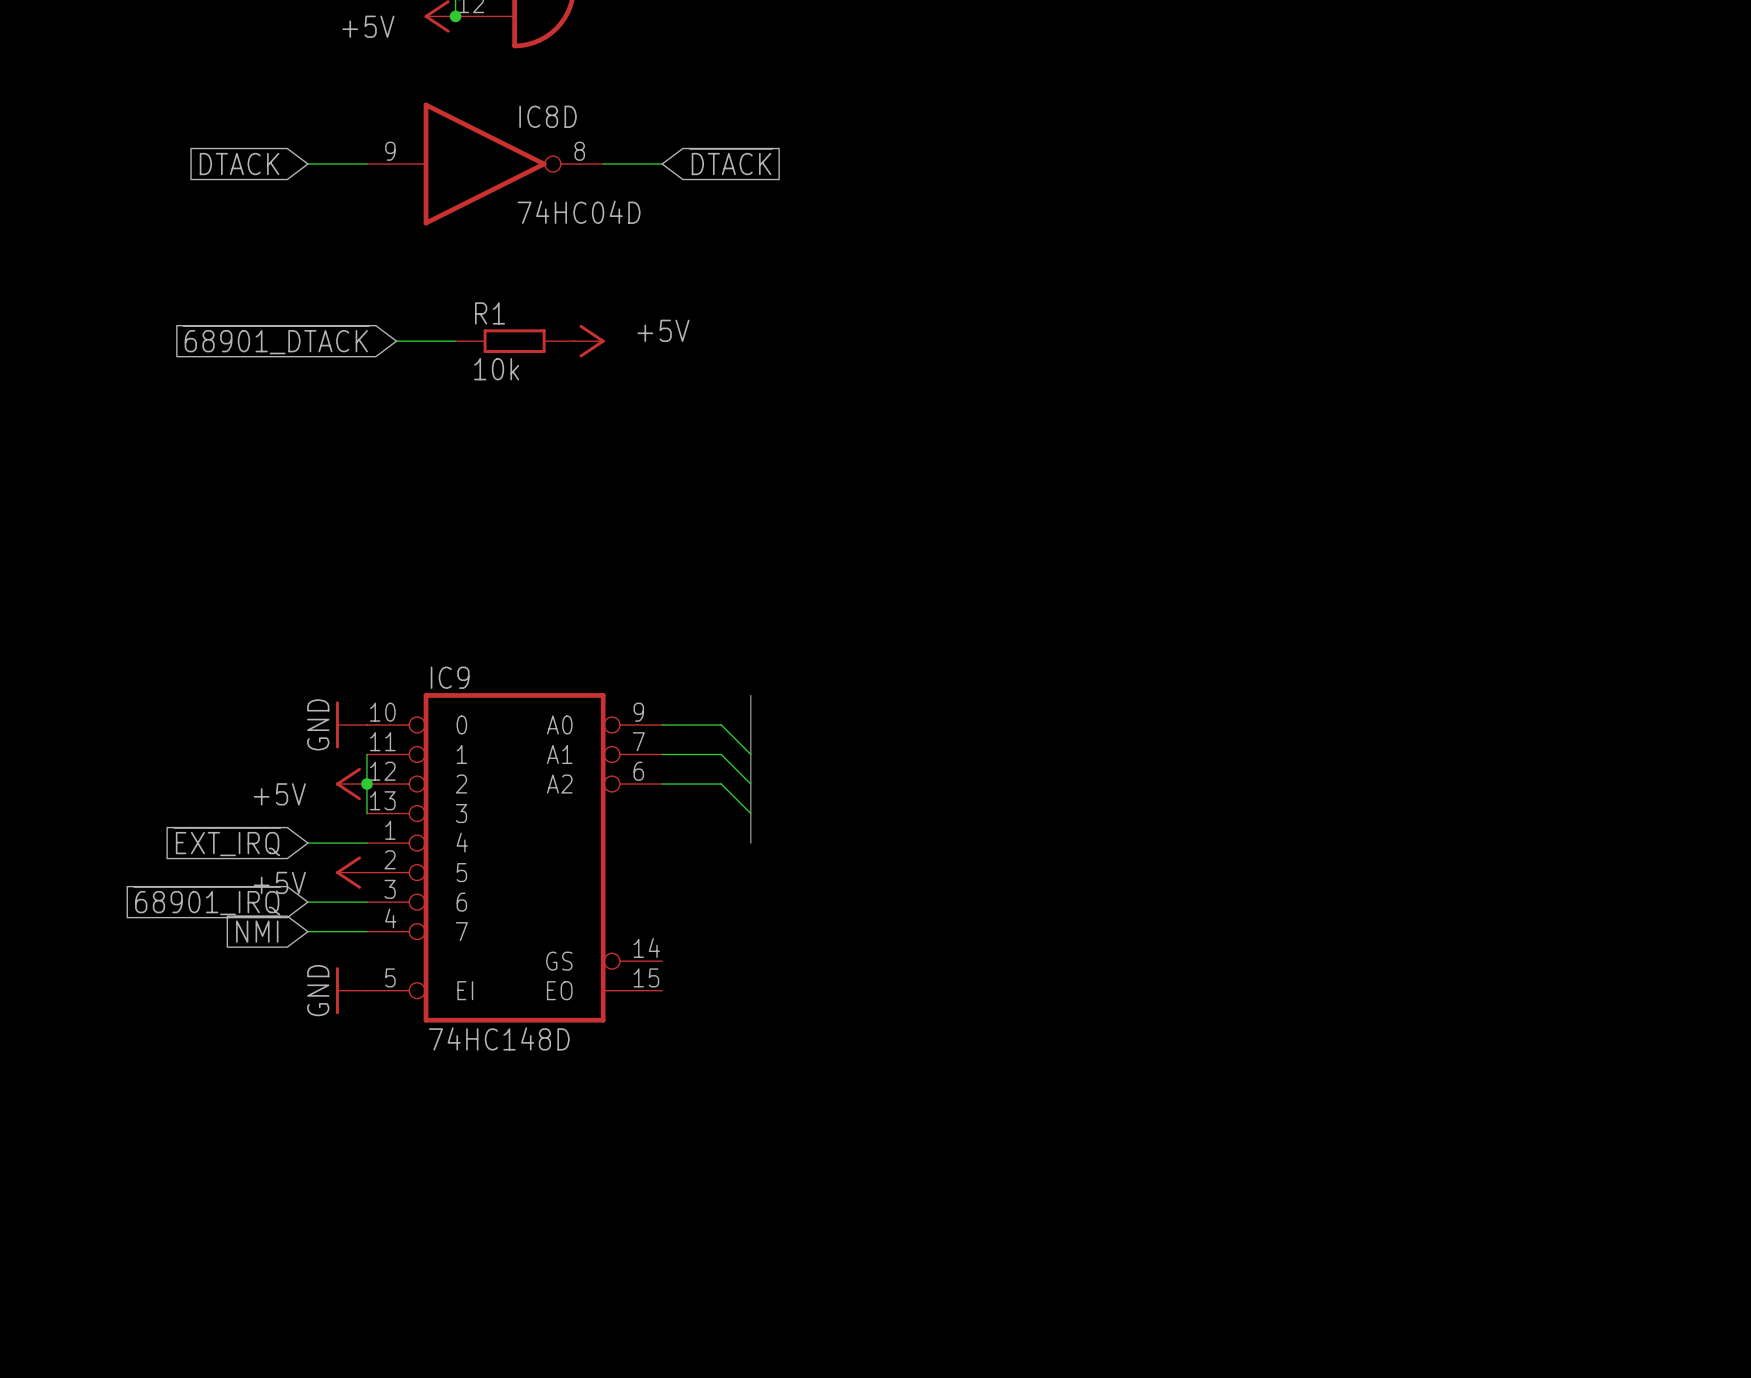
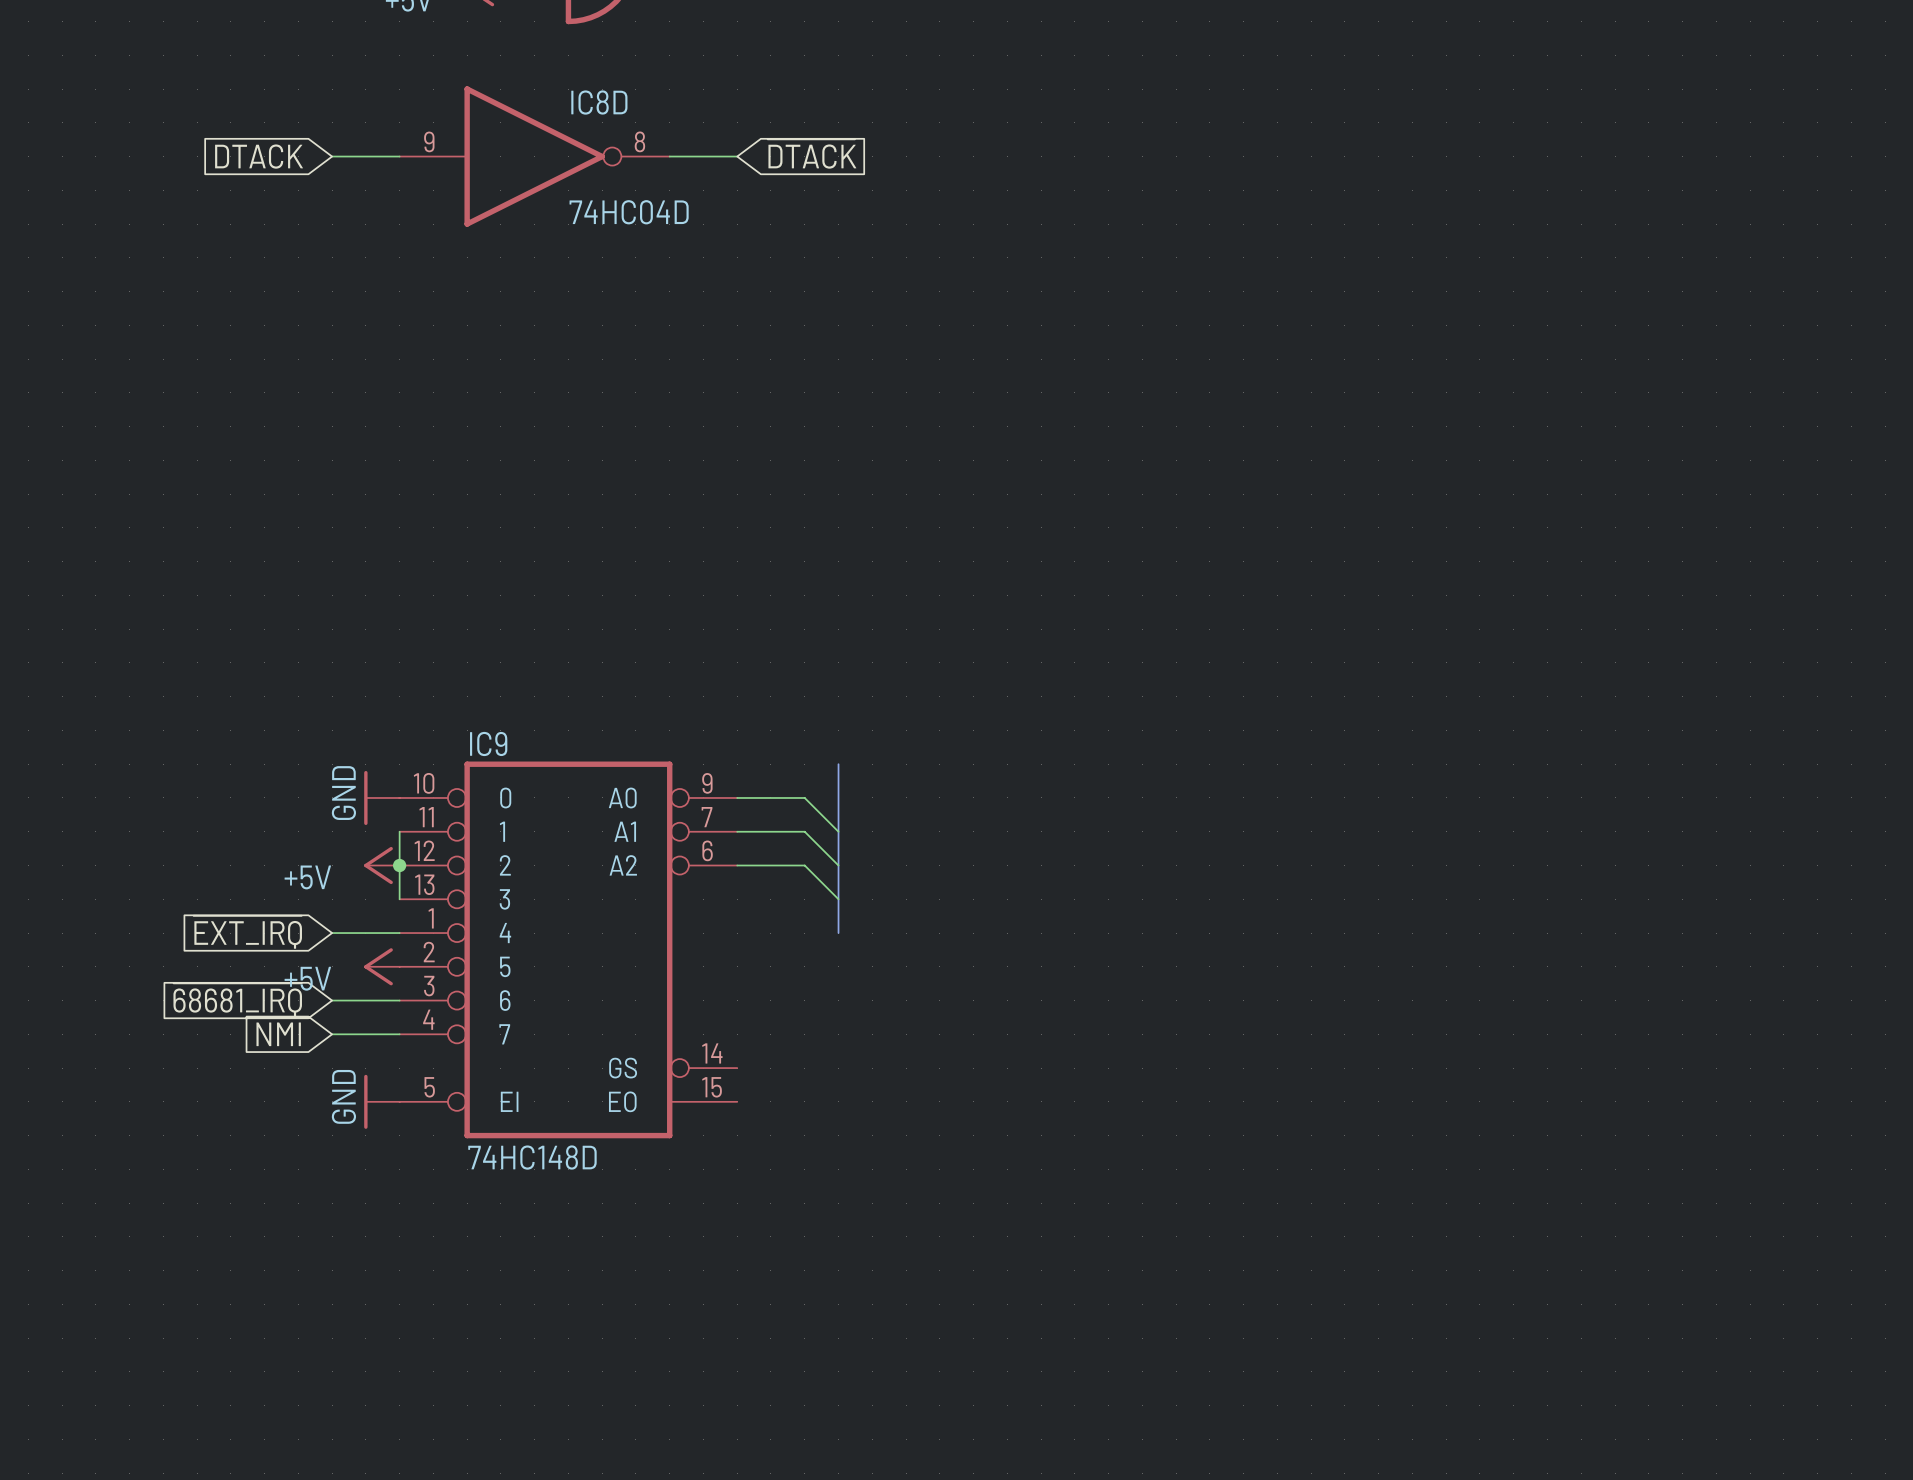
global label: ~{68901_DTACK} (276, 339) -> none
wire: (396, 341) (455, 341) -> none
R1: 10k (514, 341) -> none
power symbol: +5V (589, 341) -> none
global label: ~{68901_IRQ} (207, 900) -> ~{68681_IRQ} (237, 999)

